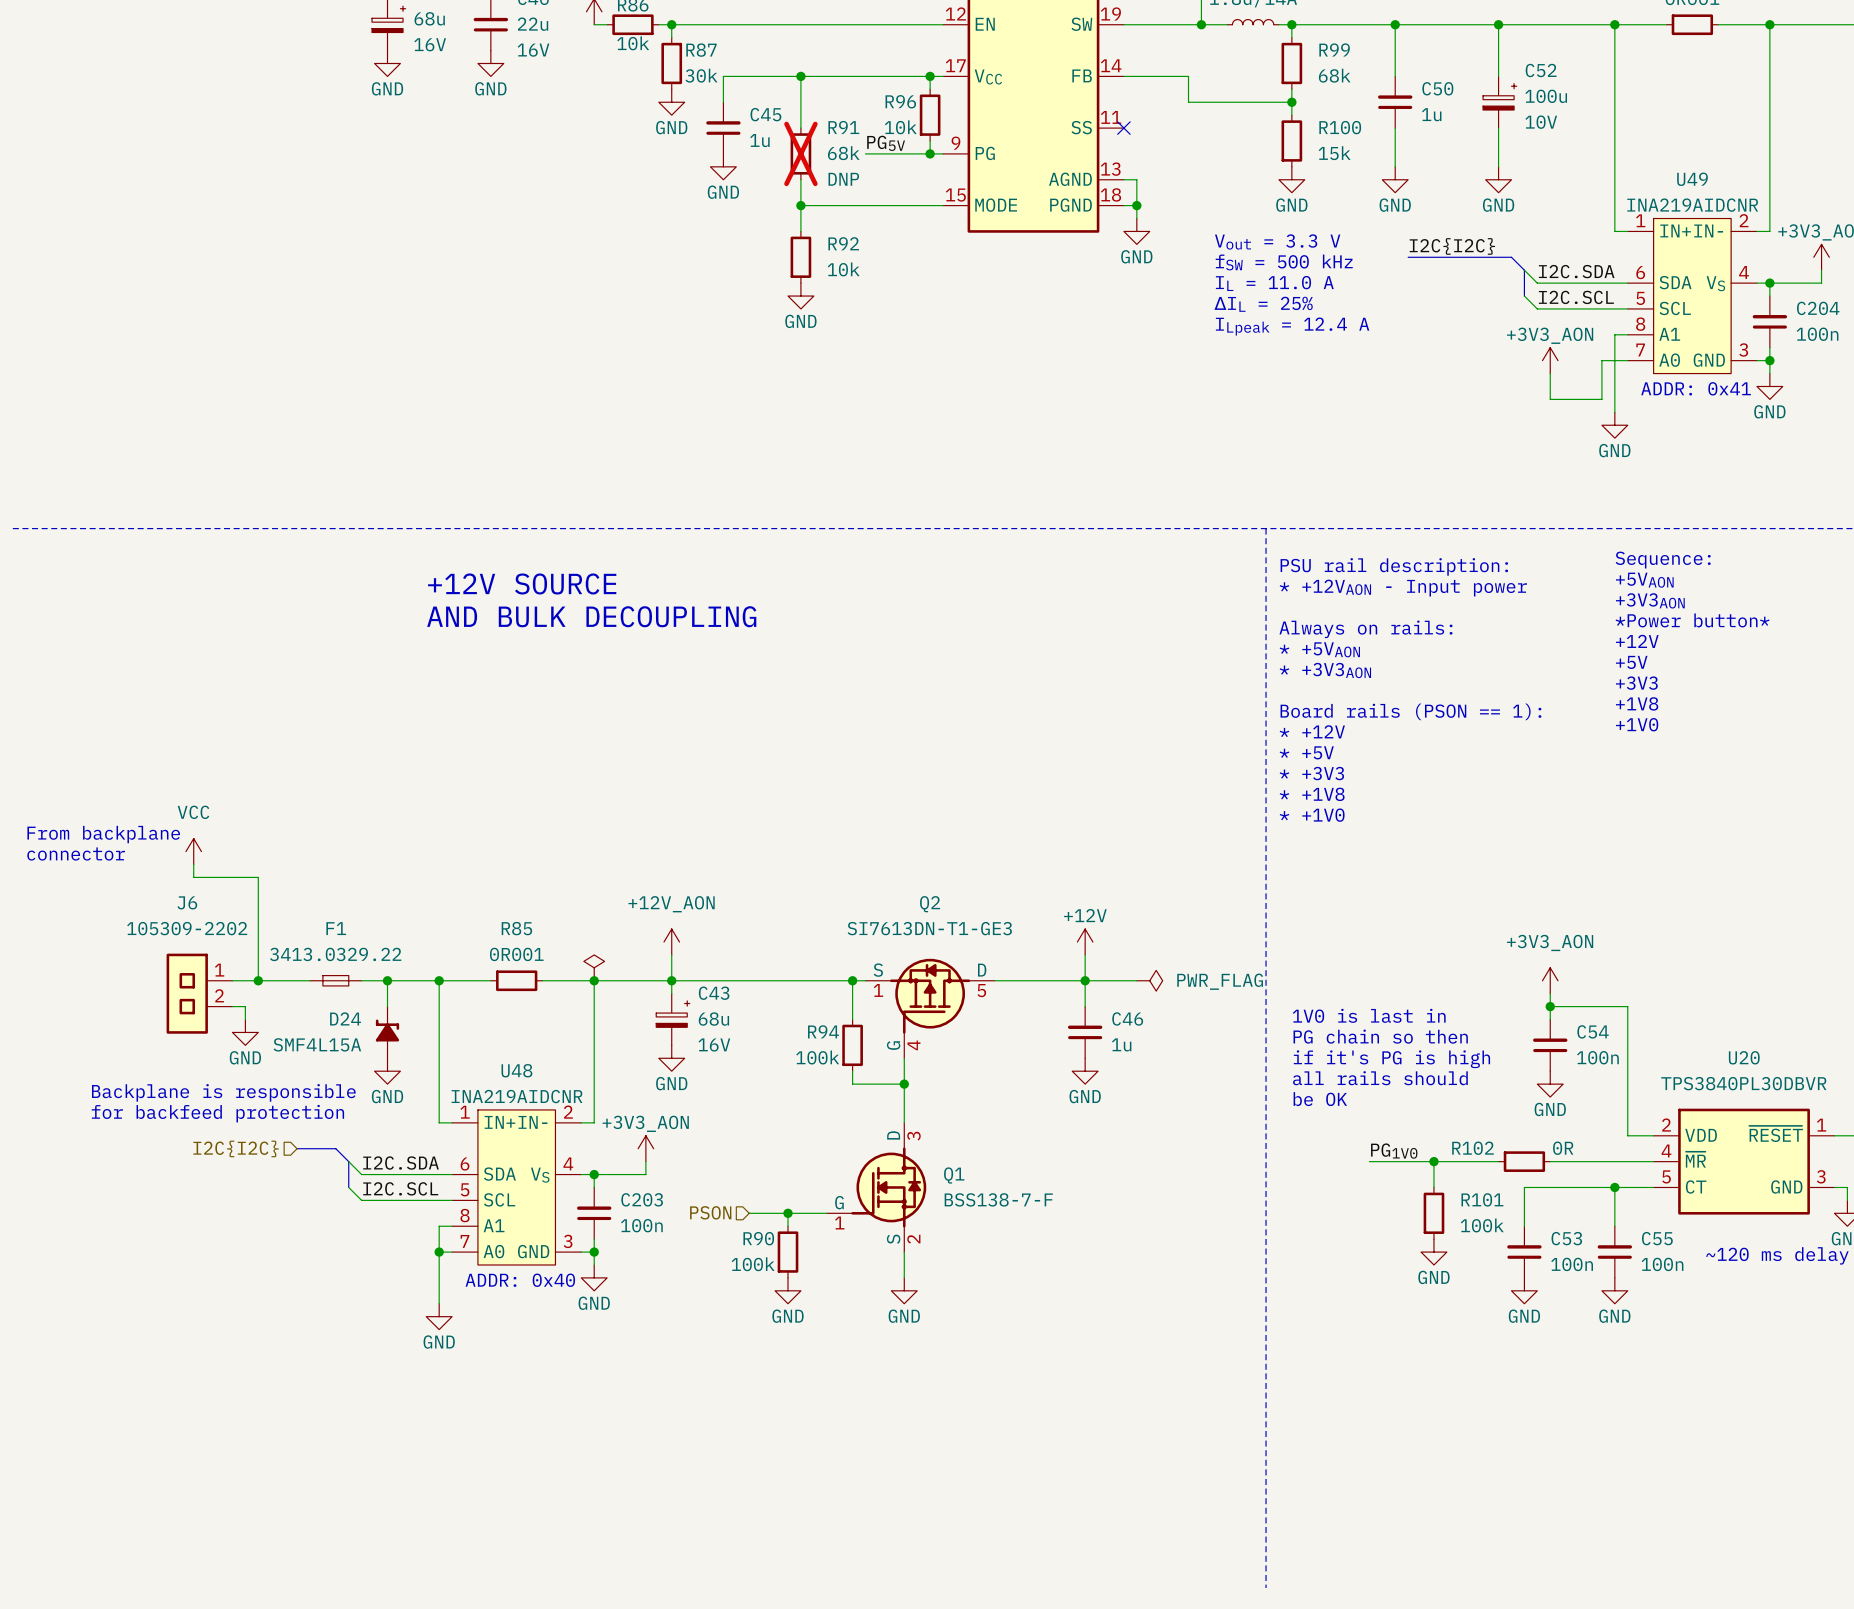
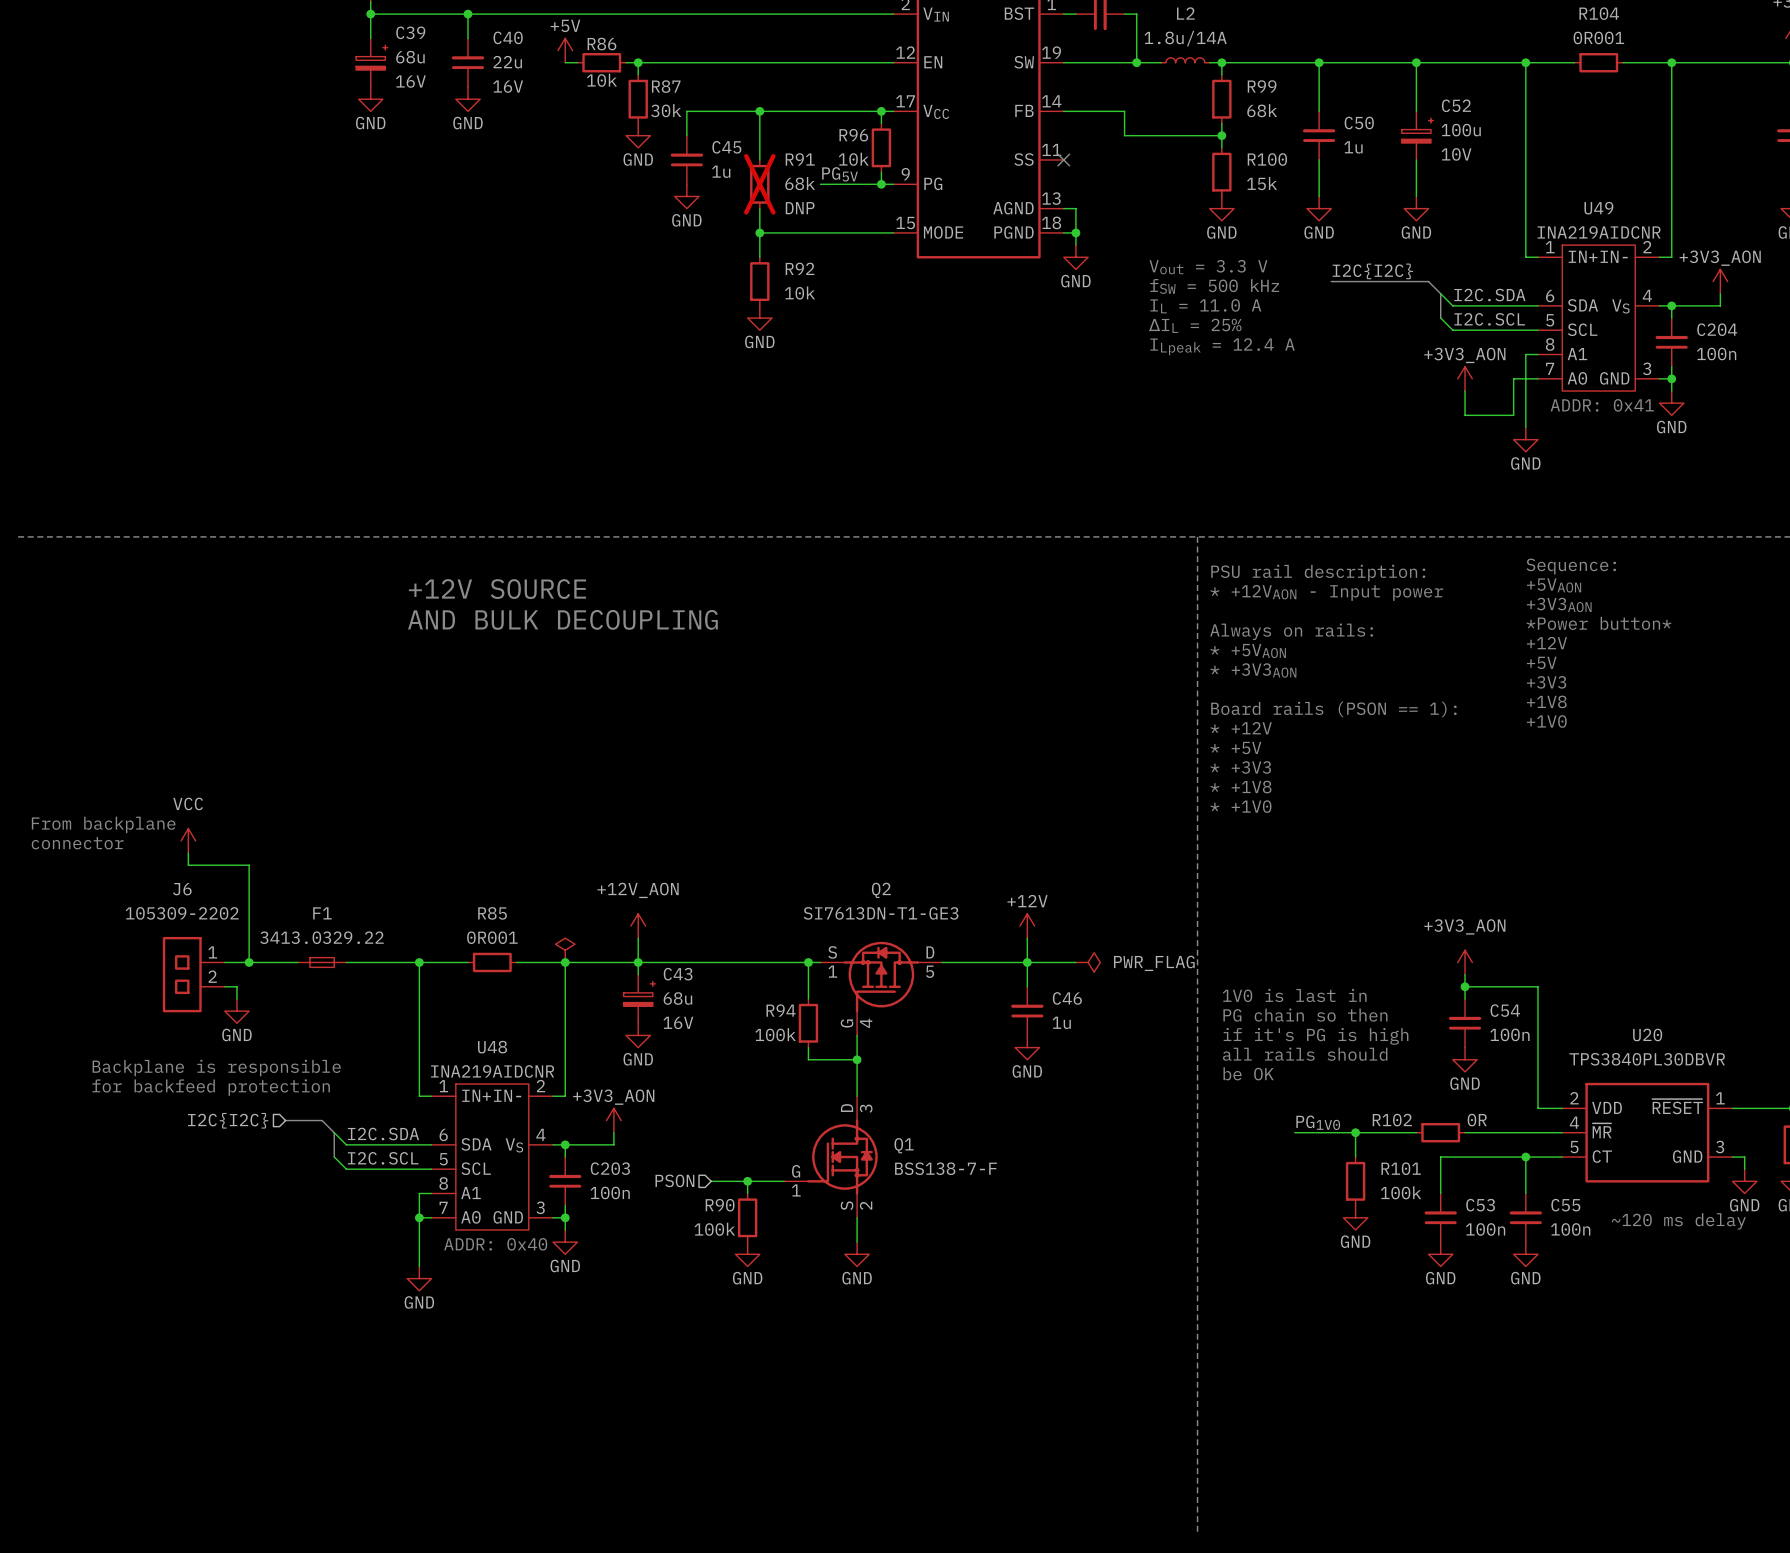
wire: (387, 980) (387, 1006) -> none
junction: (387, 980) -> none
D24: (387, 1032) -> none
power symbol: GND (387, 1071) -> none

